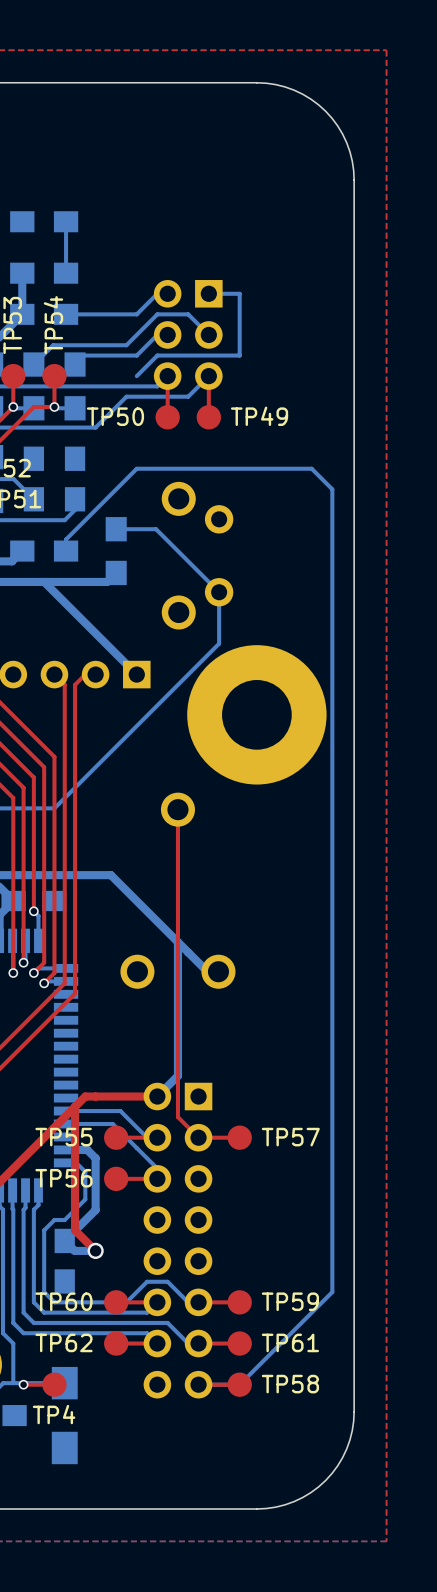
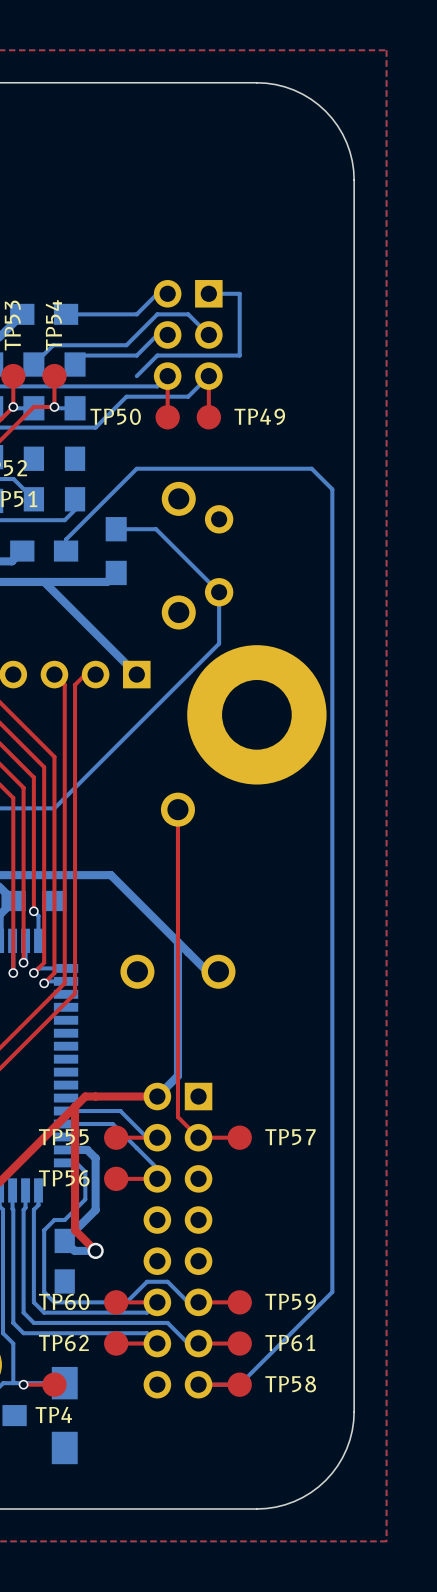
part: (44, 221) -> none
bottom track: (66, 221) (66, 273) -> none
bottom track: (22, 273) (22, 314) -> none
part: (44, 273) -> none

